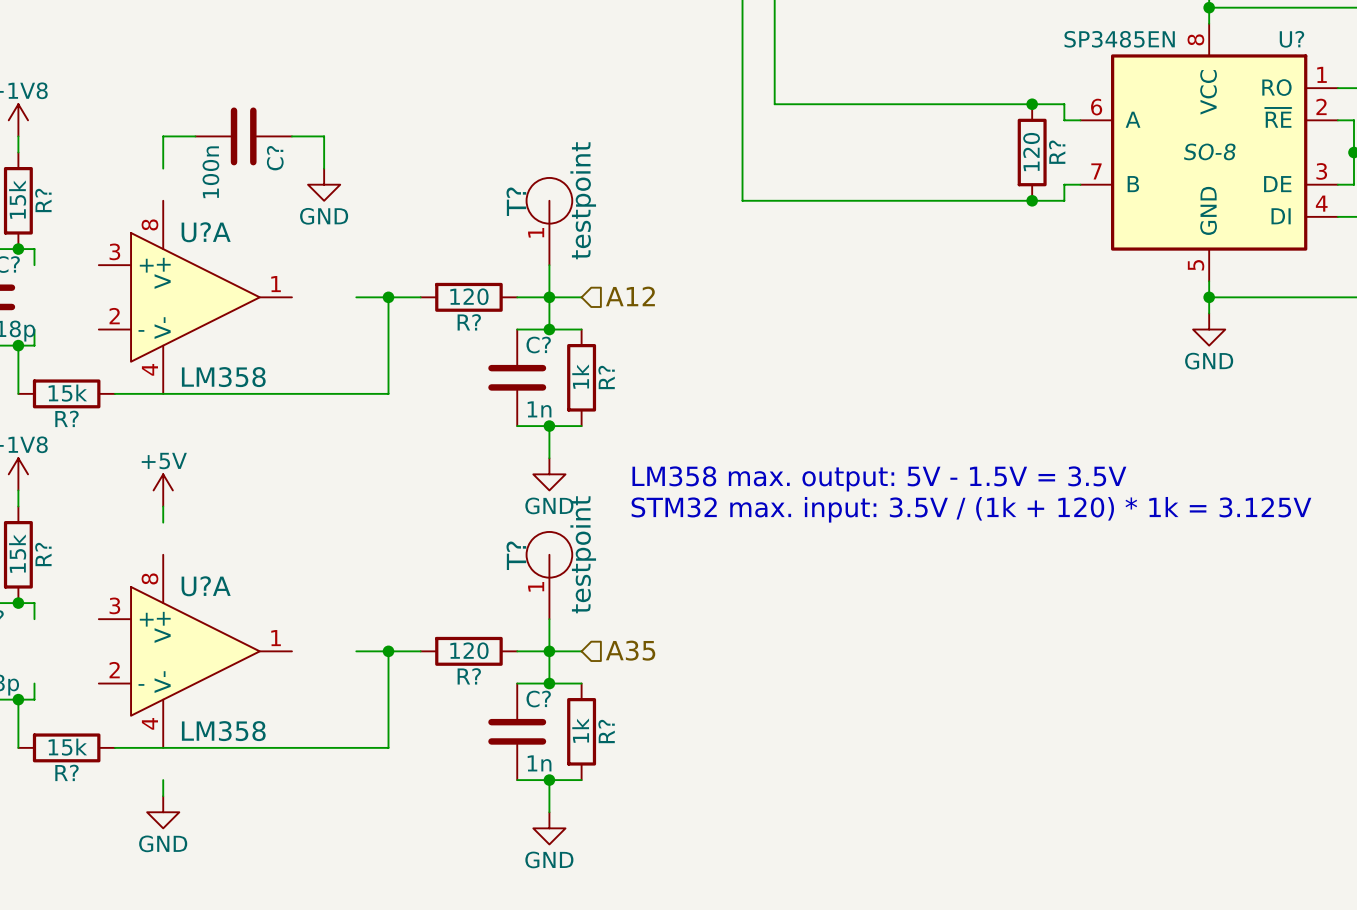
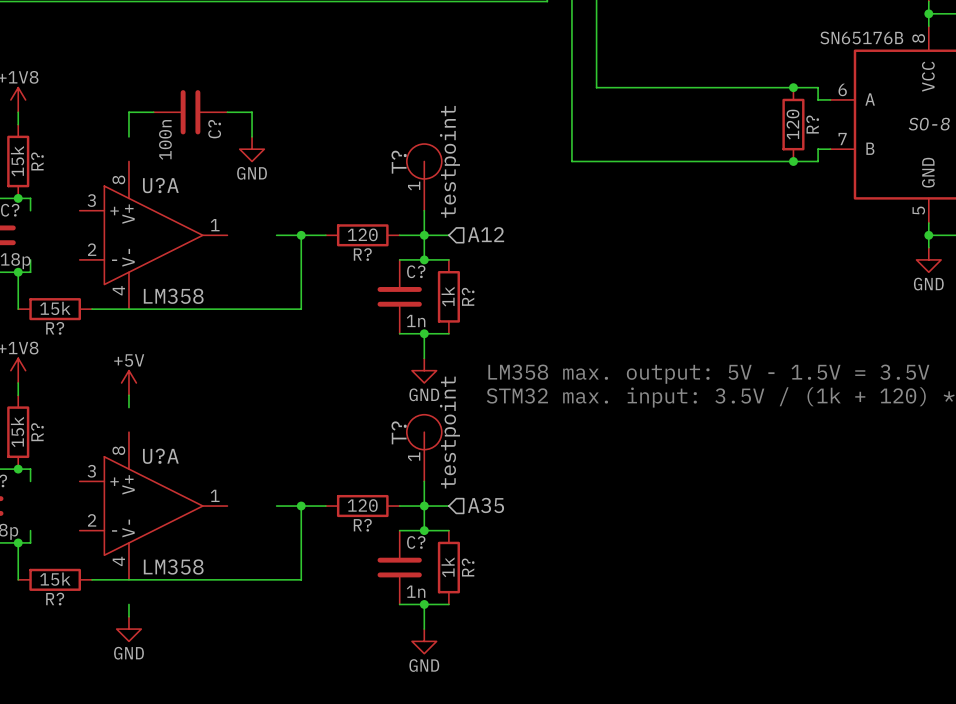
U? value: SP3485EN (1119, 39) -> SN65176B (861, 37)

